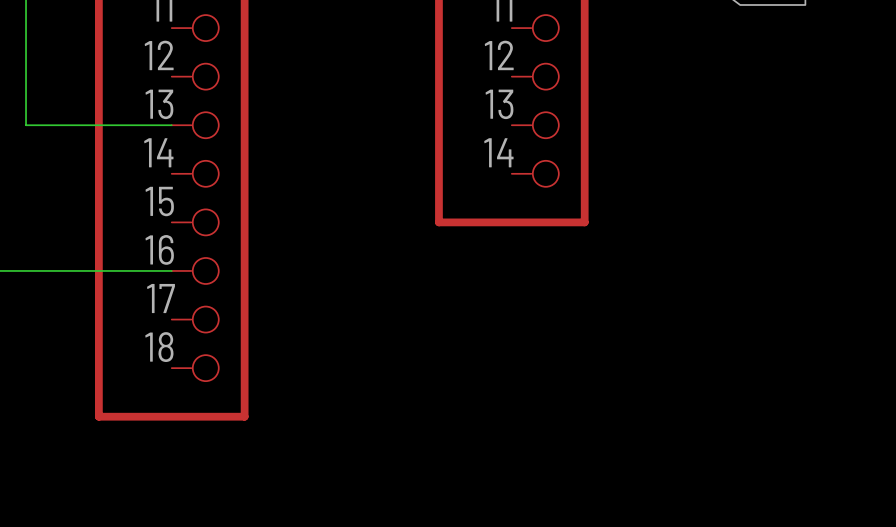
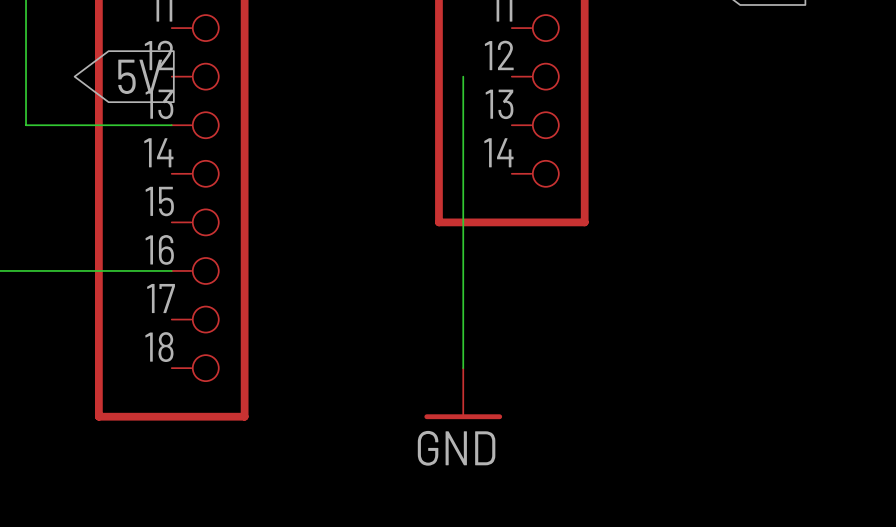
global label: none -> 5V (140, 76)
wire: none -> (463, 76) (463, 368)
power symbol: none -> GND (463, 393)

